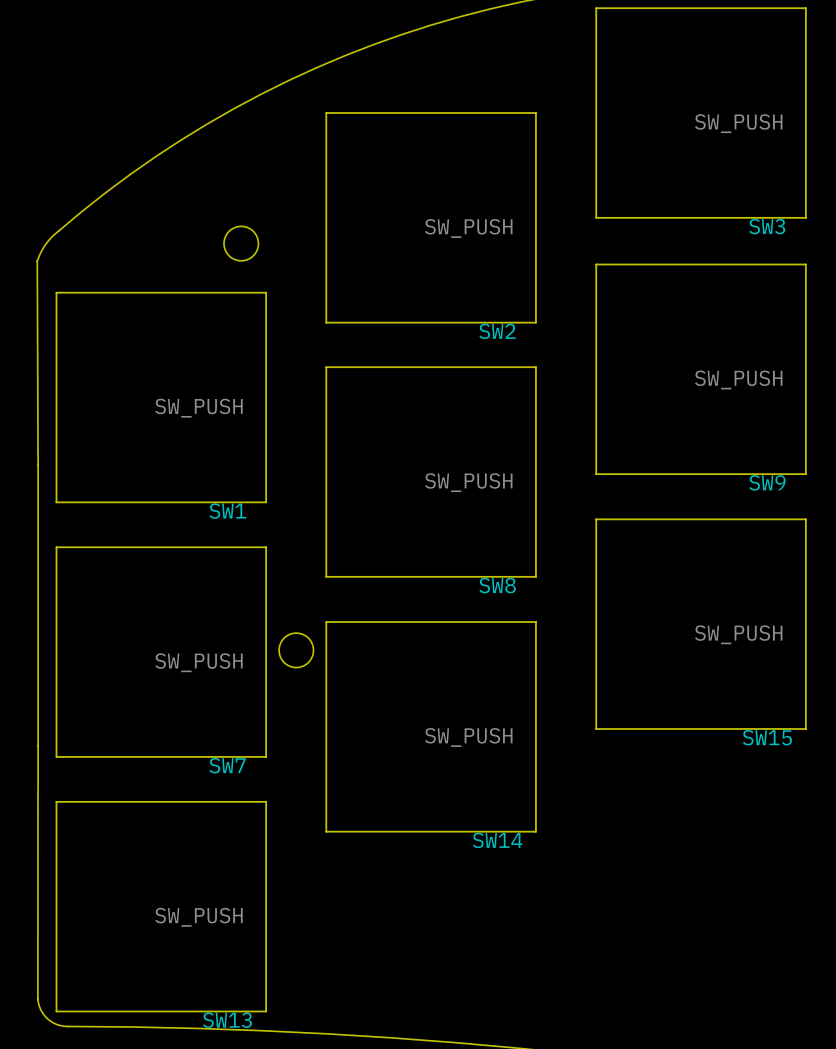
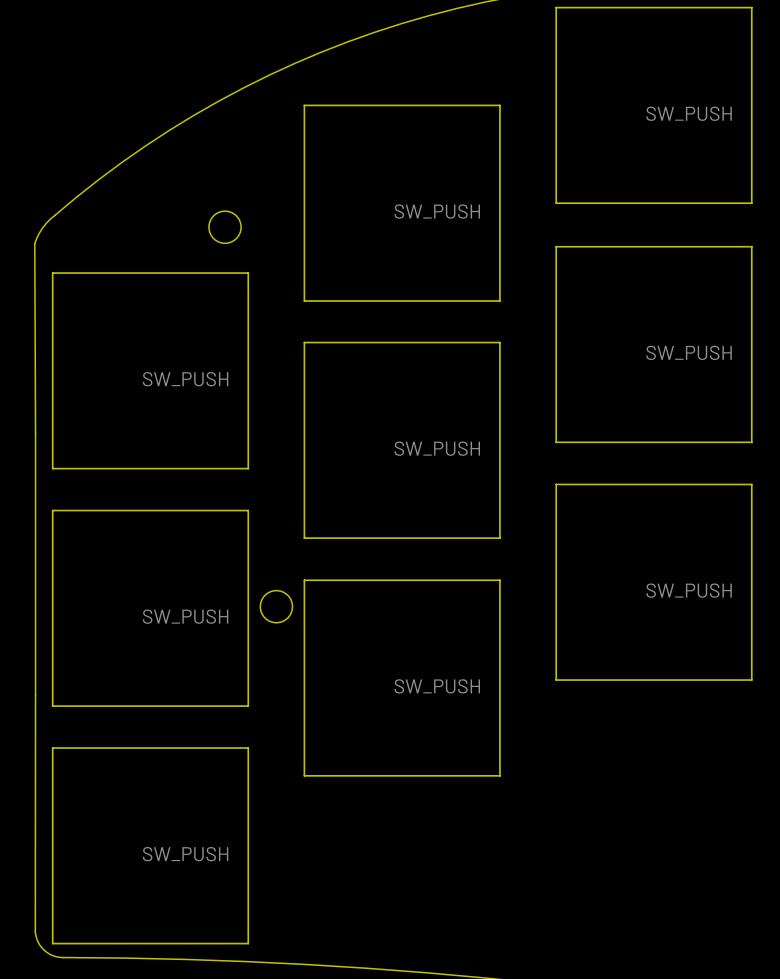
drawing: none -> [555, 6, 753, 205]
drawing: none -> [303, 104, 501, 302]
SW3: SW_PUSH (701, 113) -> none
SW2: SW_PUSH (431, 217) -> none
drawing: none -> [555, 245, 753, 444]
drawing: none -> [51, 272, 250, 470]
drawing: none -> [303, 341, 501, 539]
SW9: SW_PUSH (701, 369) -> none
SW1: SW_PUSH (161, 397) -> none
SW8: SW_PUSH (431, 472) -> none
drawing: none -> [555, 483, 753, 681]
drawing: none -> [51, 509, 250, 707]
drawing: none -> [303, 579, 501, 777]
SW15: SW_PUSH (701, 624) -> none
SW7: SW_PUSH (161, 652) -> none
SW14: SW_PUSH (431, 726) -> none
drawing: none -> [51, 747, 250, 945]
SW13: SW_PUSH (161, 906) -> none

